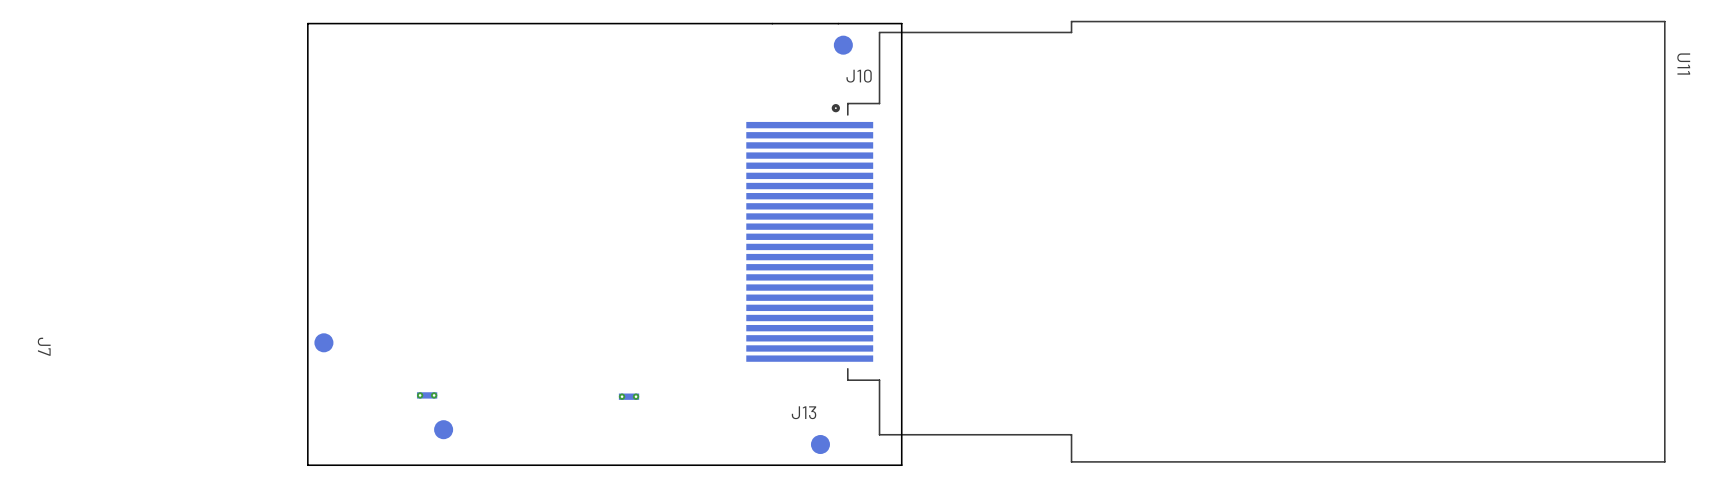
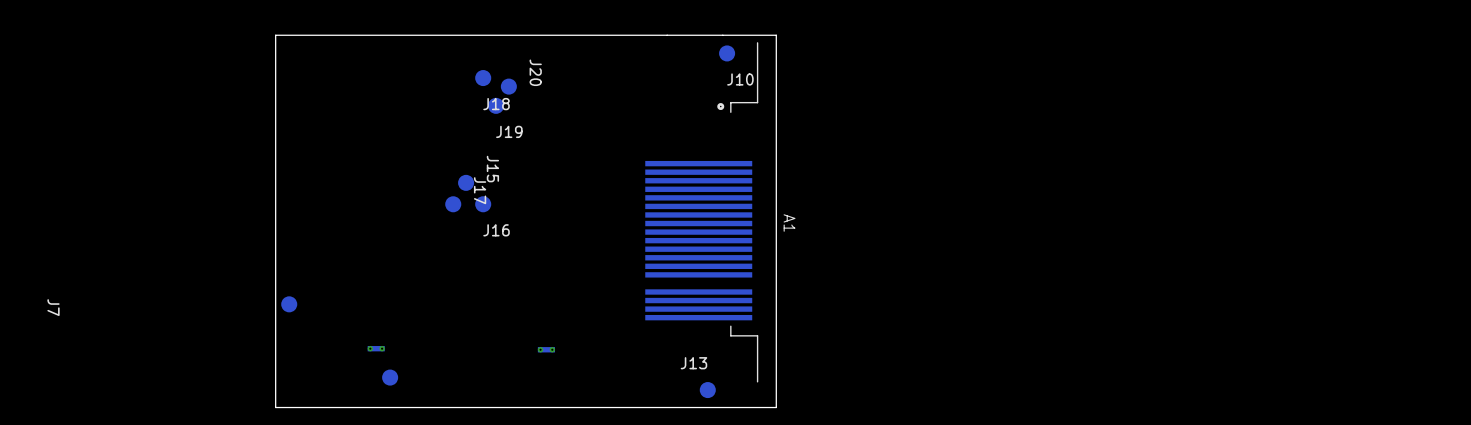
J18: none -> (483, 78)
J20: none -> (508, 86)
J19: none -> (496, 105)
J15: none -> (466, 182)
J17: none -> (453, 204)
J16: none -> (483, 204)
A1: none -> (701, 212)
U11: (1205, 241) -> none

